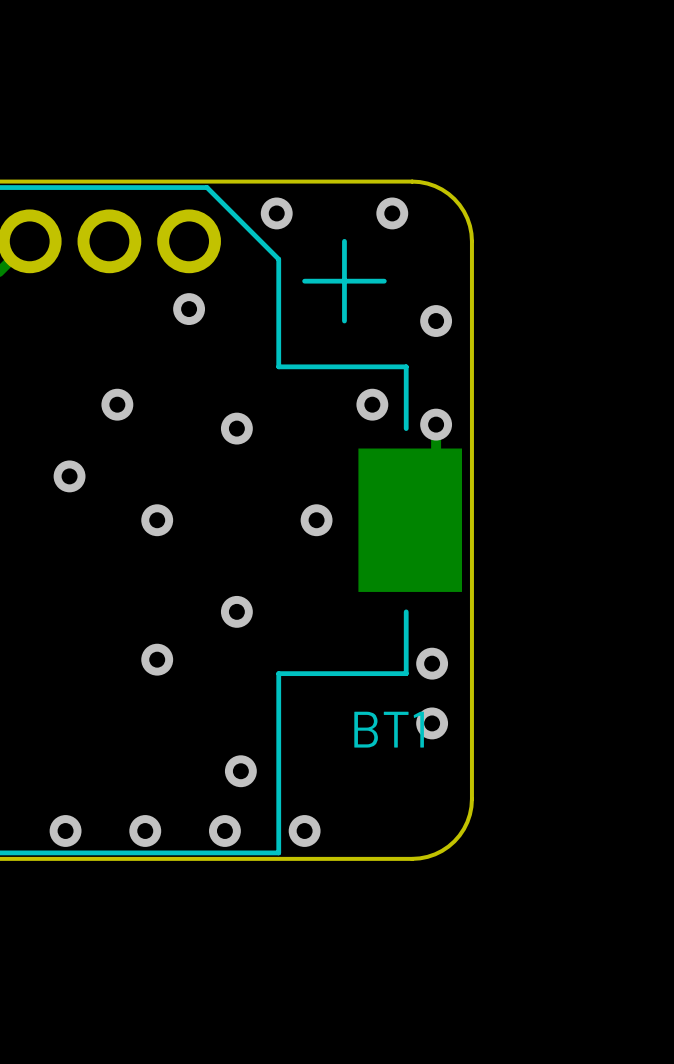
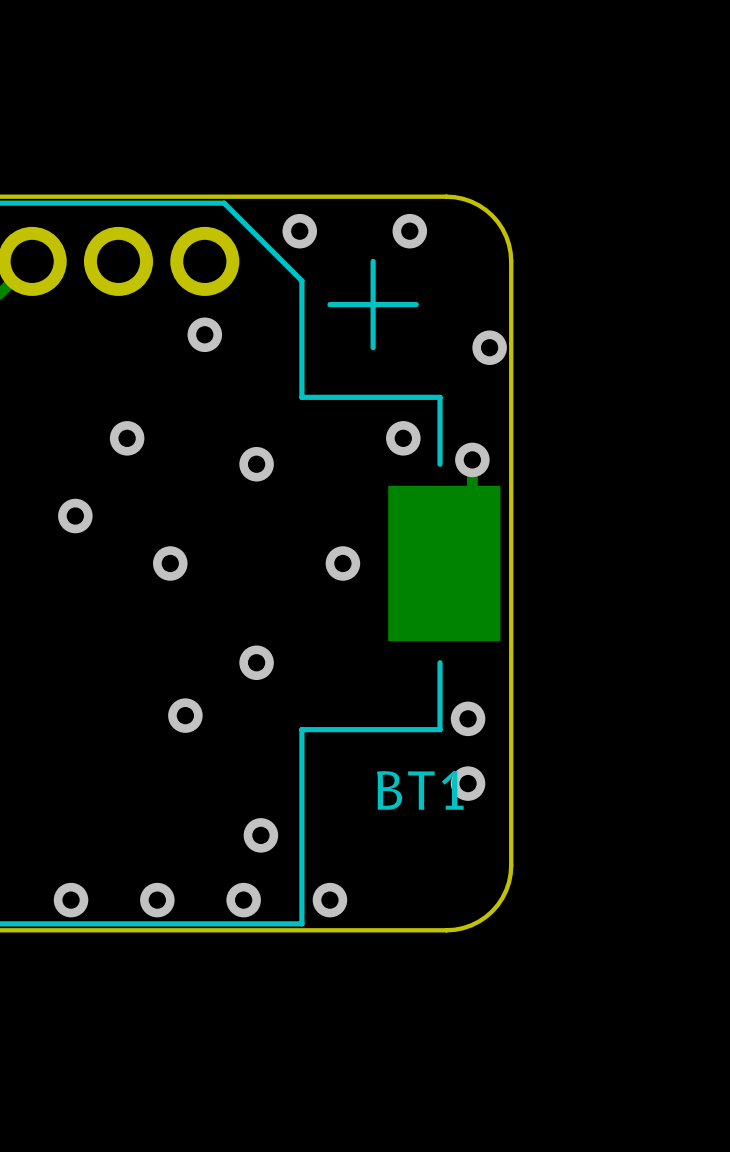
via position: (392, 213) -> (409, 231)
via position: (436, 321) -> (489, 347)
via position: (157, 659) -> (185, 715)

